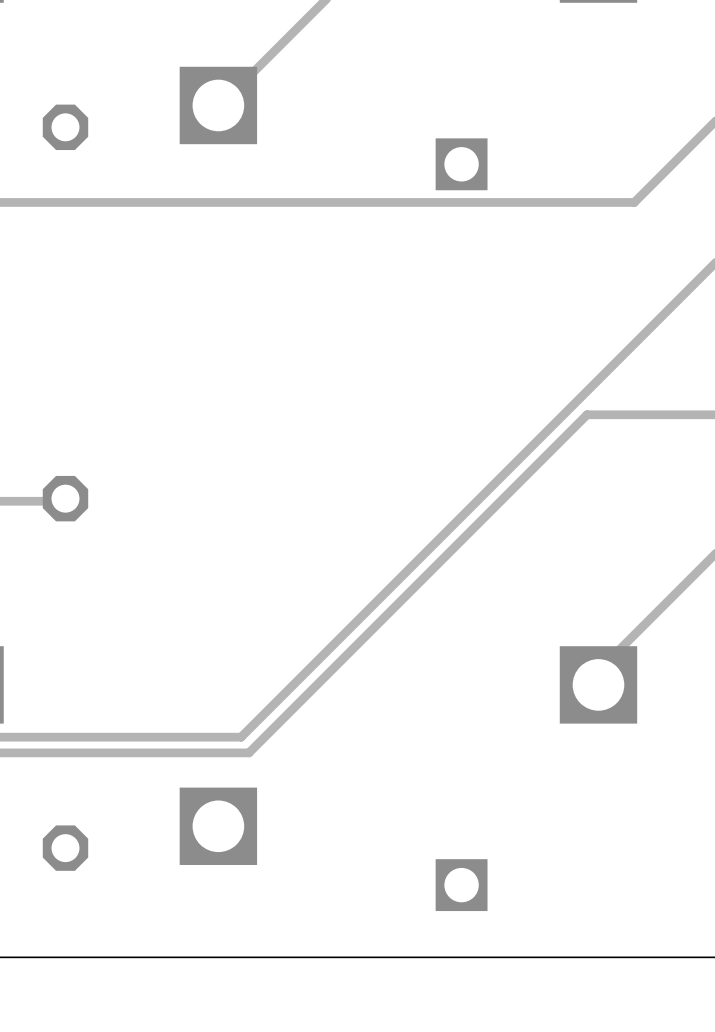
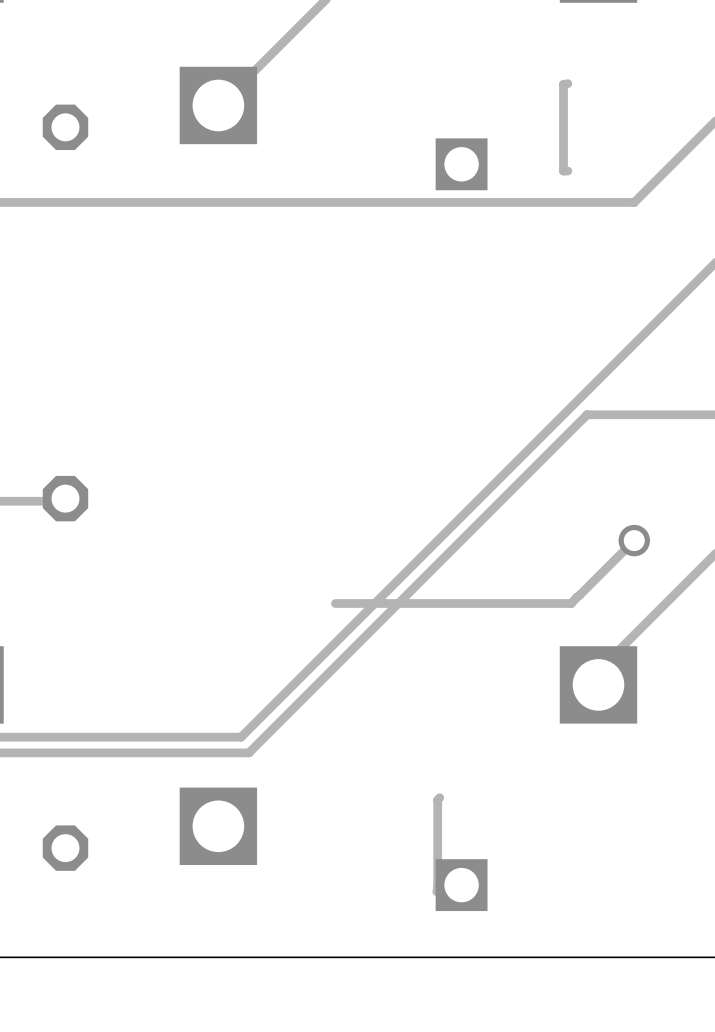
track: none -> (567, 83) (563, 84) (563, 171) (567, 171)
track: none -> (634, 540) (571, 603) (335, 603)
via: none -> (634, 540)
track: none -> (439, 797) (437, 800) (436, 891)

